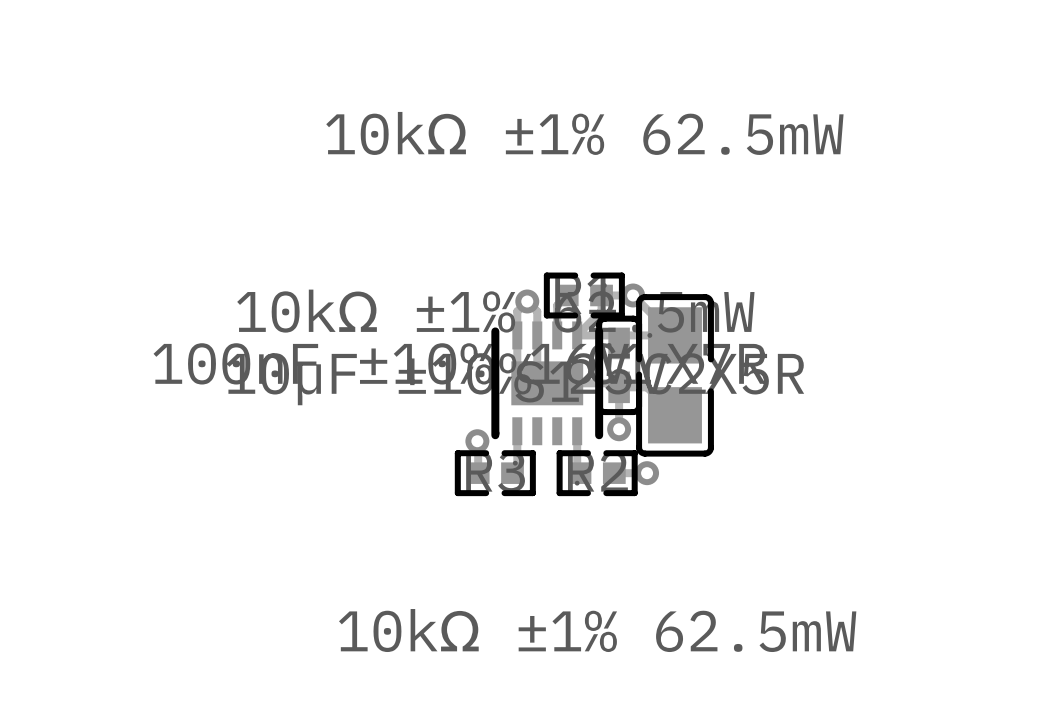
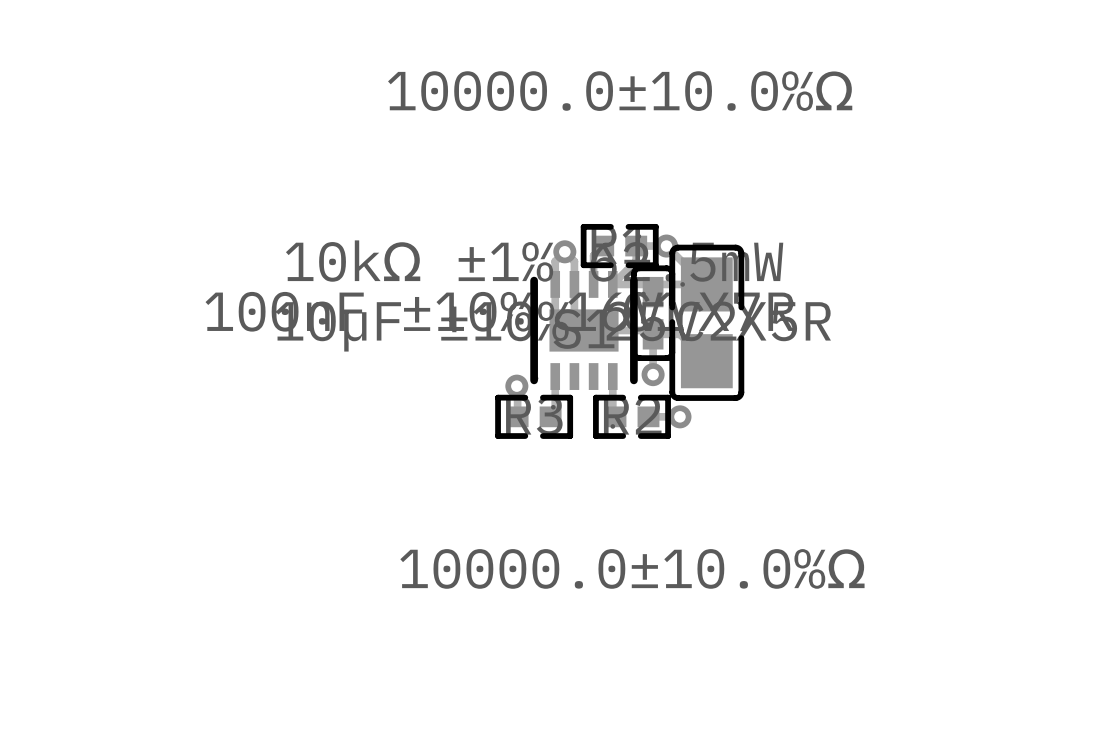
part value: 10kΩ ±1% 62.5mW (584, 133) -> 10000.0±10.0%Ω (620, 91)
part value: 10kΩ ±1% 62.5mW (597, 630) -> 10000.0±10.0%Ω (632, 568)

